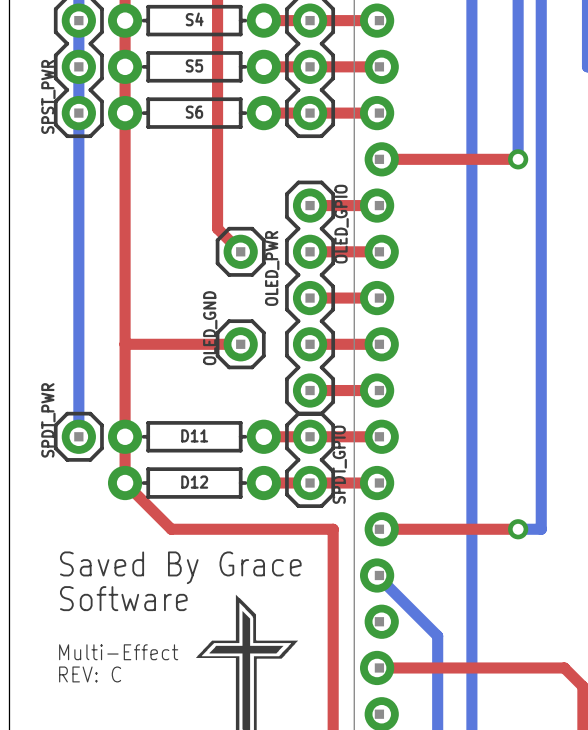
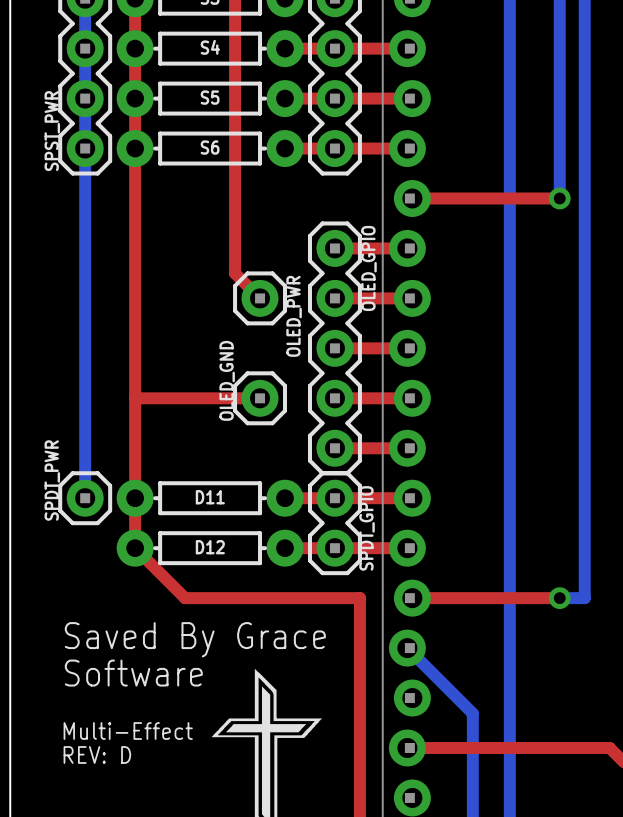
text: REV: C (90, 674) -> REV: D (97, 754)

